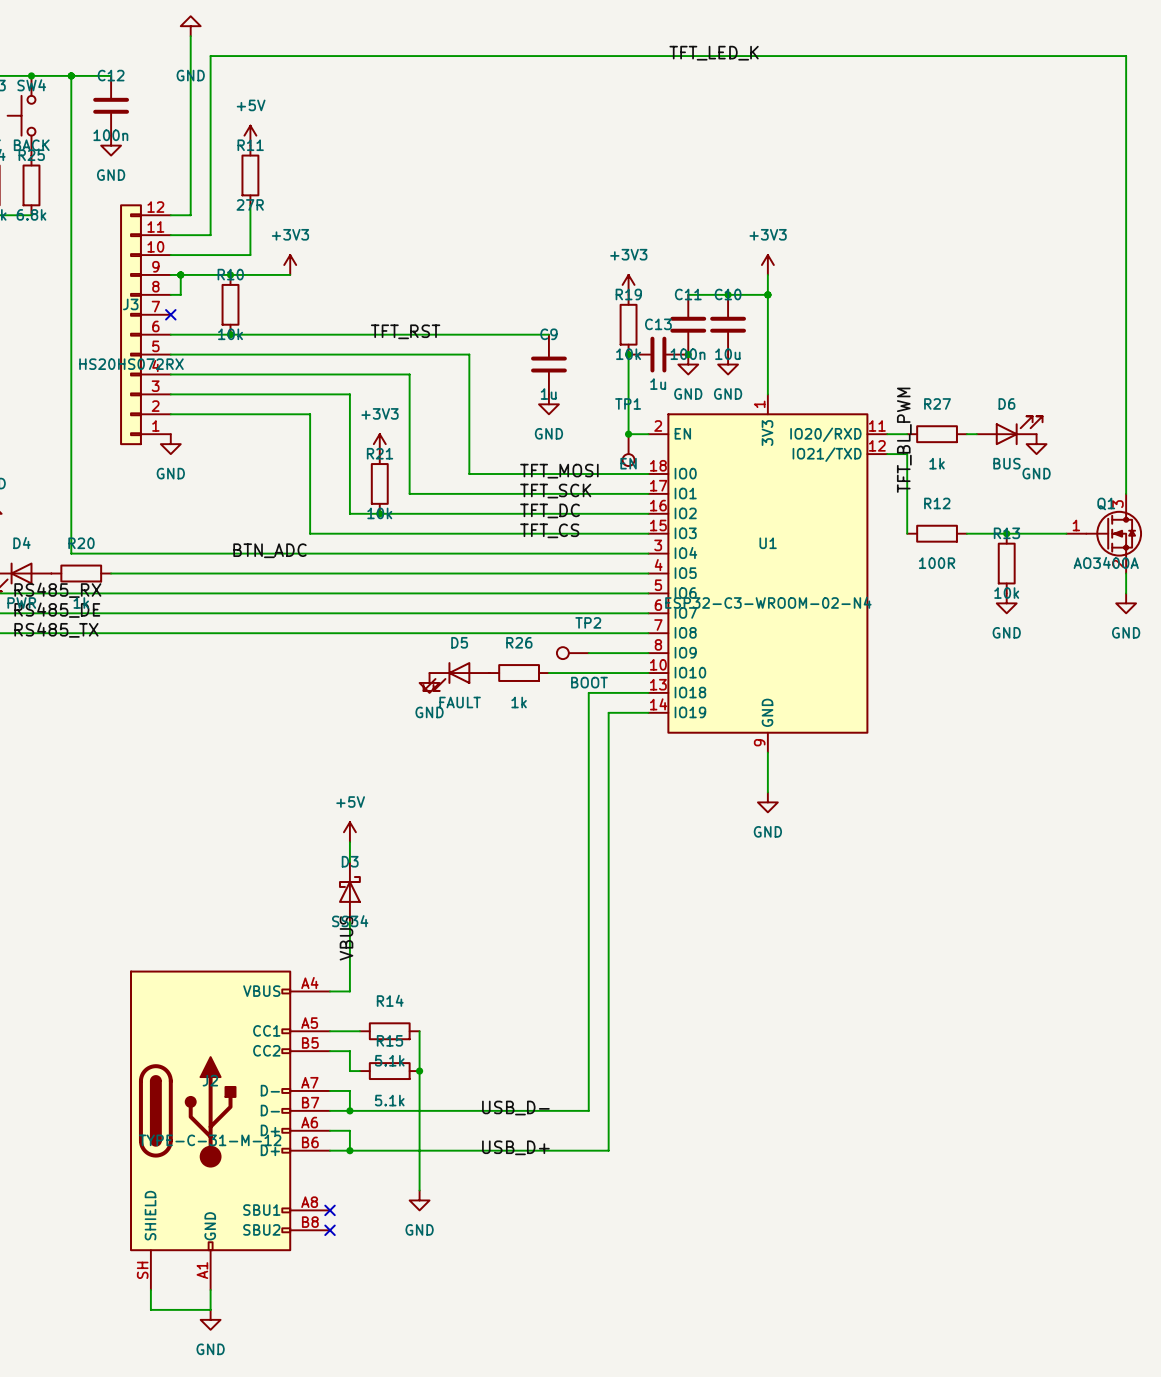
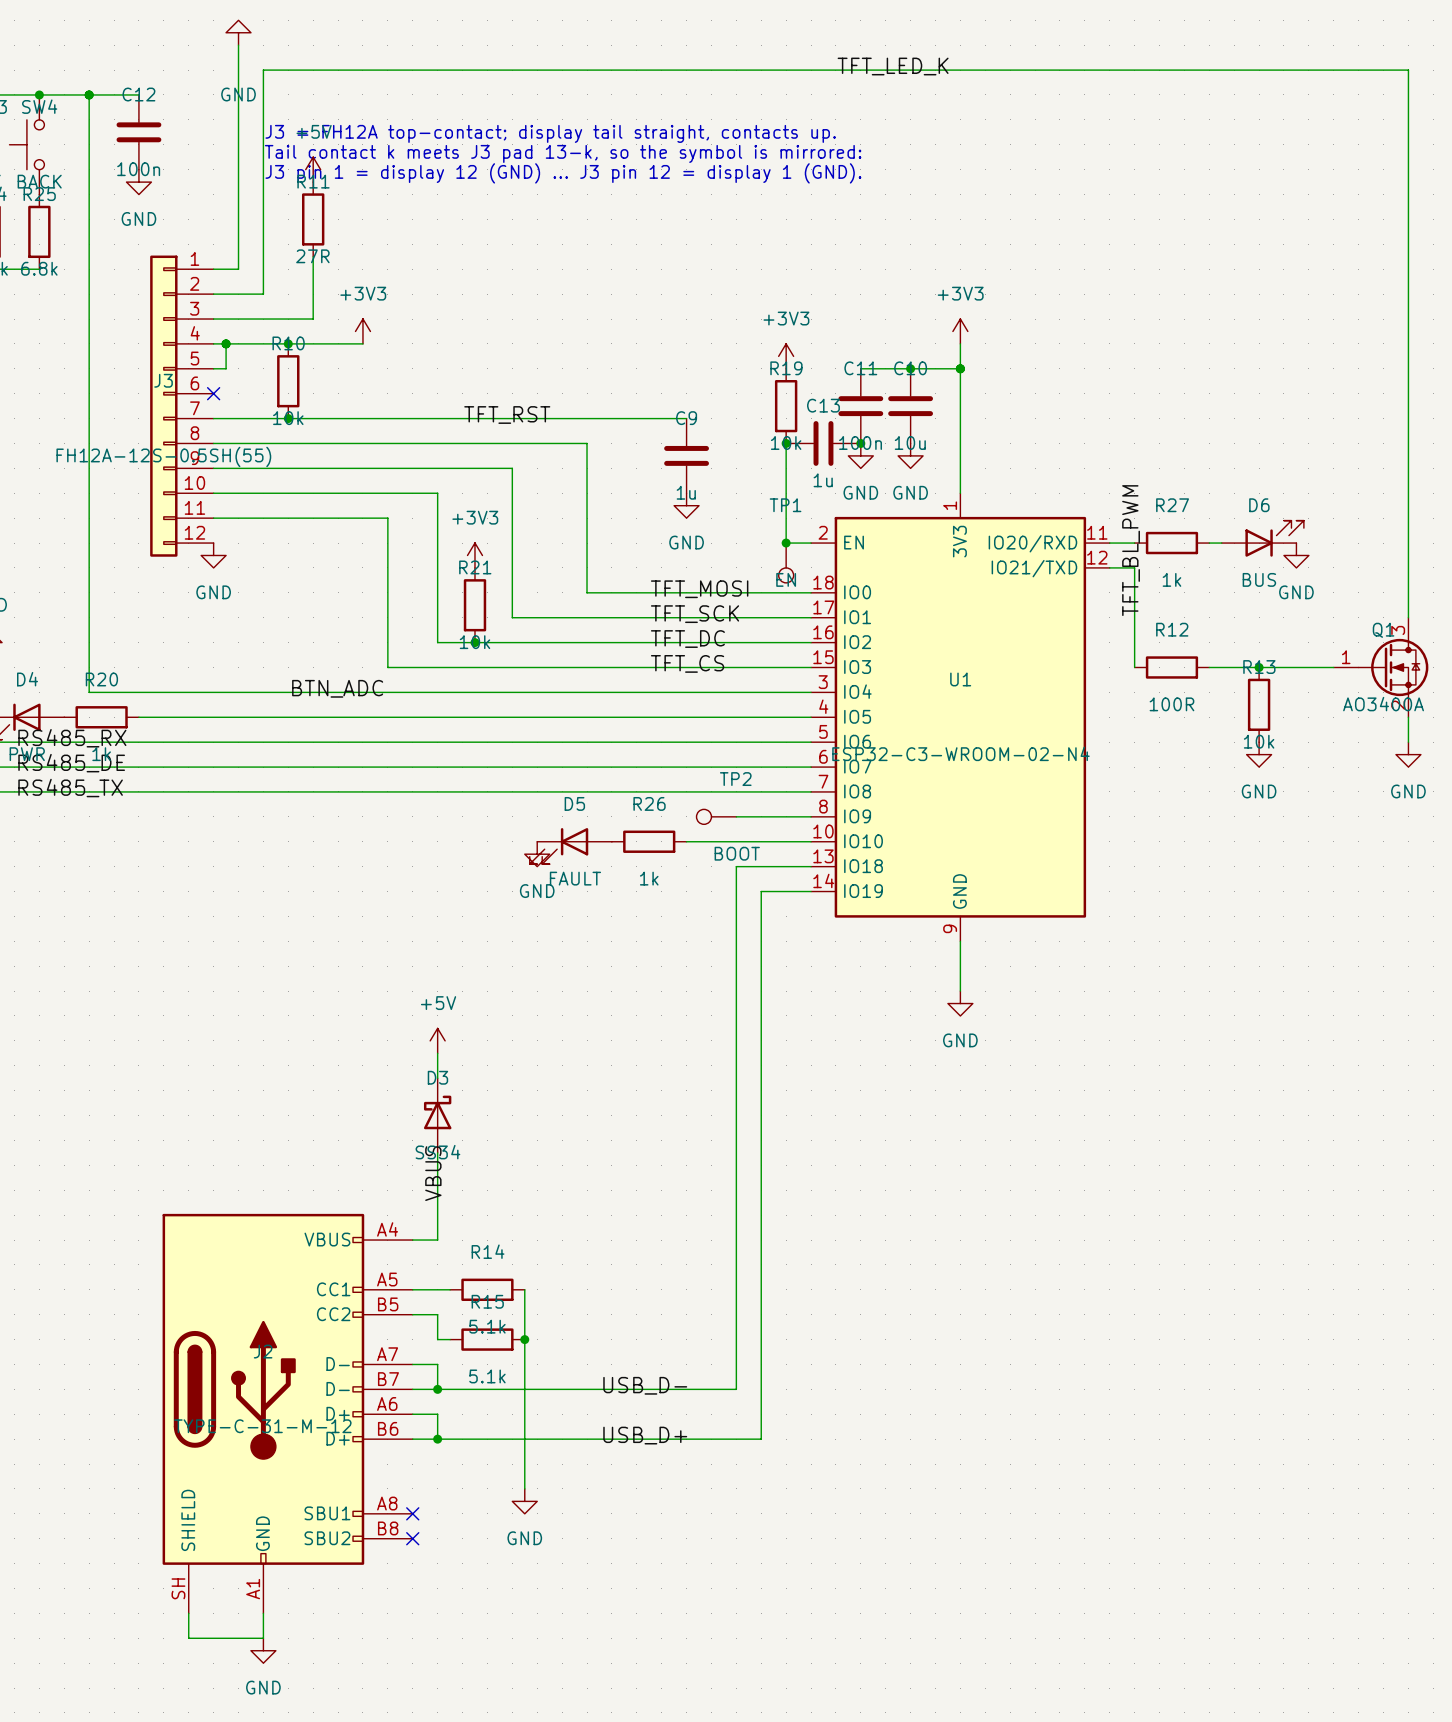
text: none -> J3 = FH12A top-contact; display tail straight, contacts up. (550, 133)
text: none -> Tail contact k meets J3 pad 13-k, so the symbol is mirrored: (563, 153)
text: none -> J3 pin 1 = display 12 (GND) ... J3 pin 12 = display 1 (GND). (563, 173)
J3 flip: as is (131, 324) -> up-down (163, 406)
J3 value: HS20HS072RX (131, 364) -> FH12A-12S-0.5SH(55) (163, 456)

